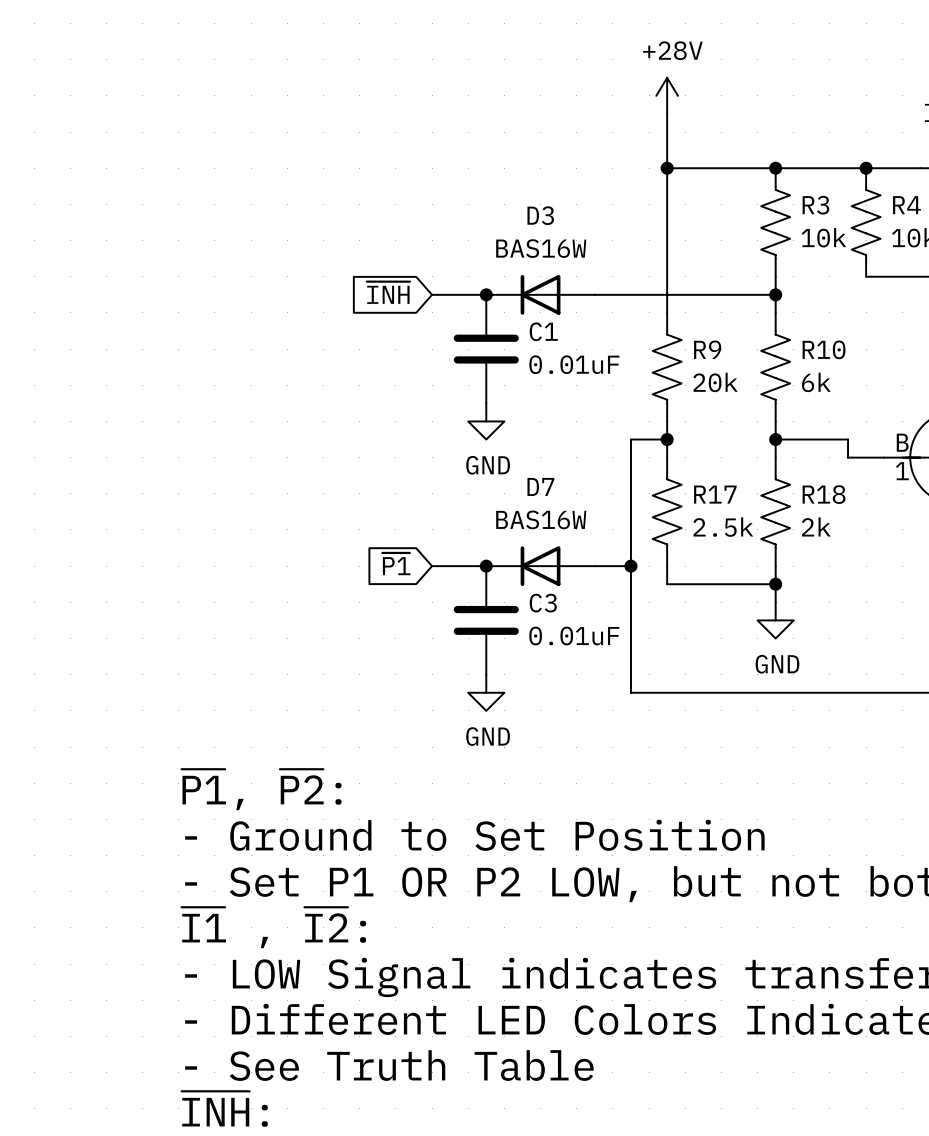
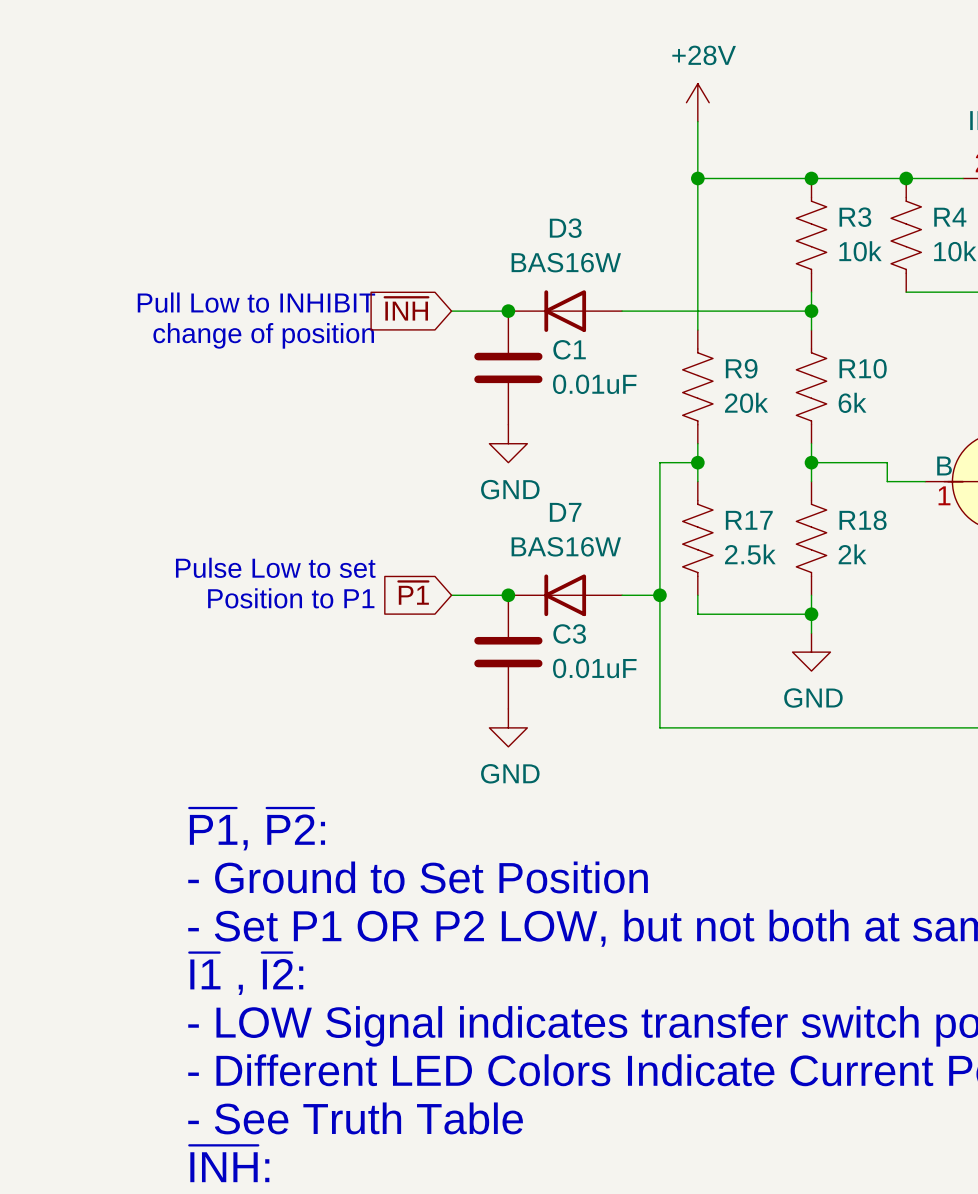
text: none -> Pull Low to INHIBIT (256, 302)
text: none -> change of position (263, 335)
text: none -> Pulse Low to set (275, 567)
text: none -> Position to P1 (291, 598)

